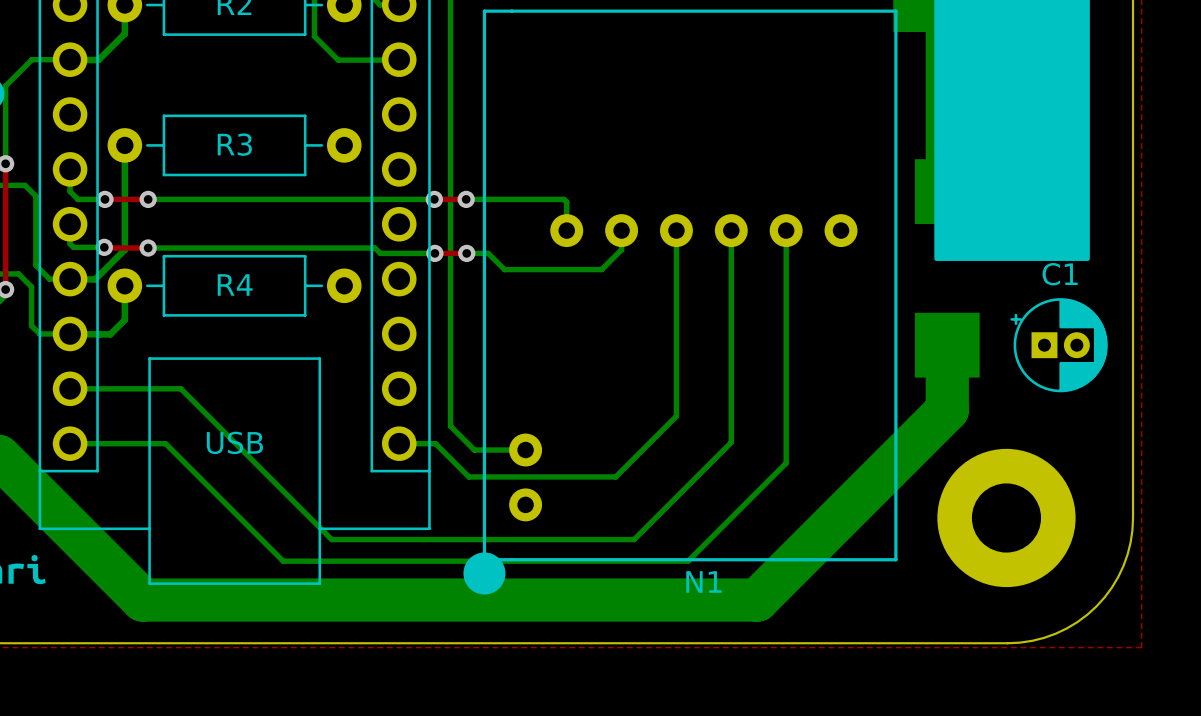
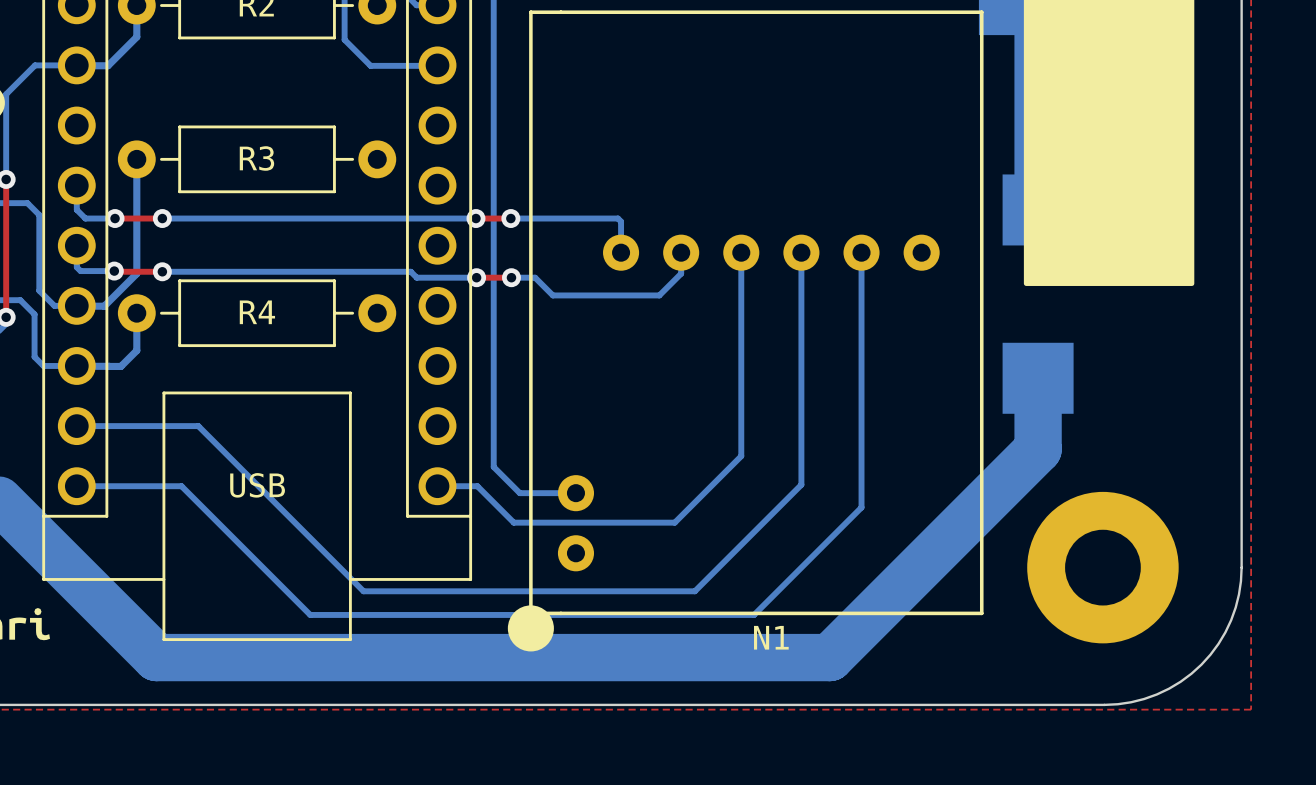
C1: (1059, 345) -> none

